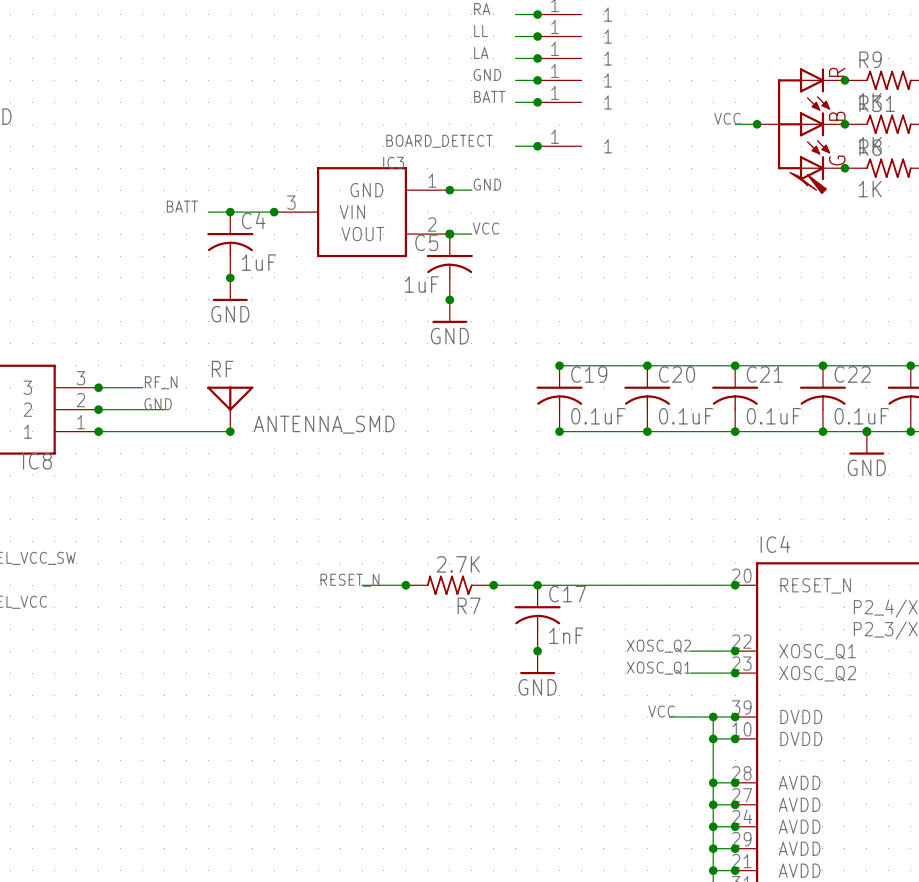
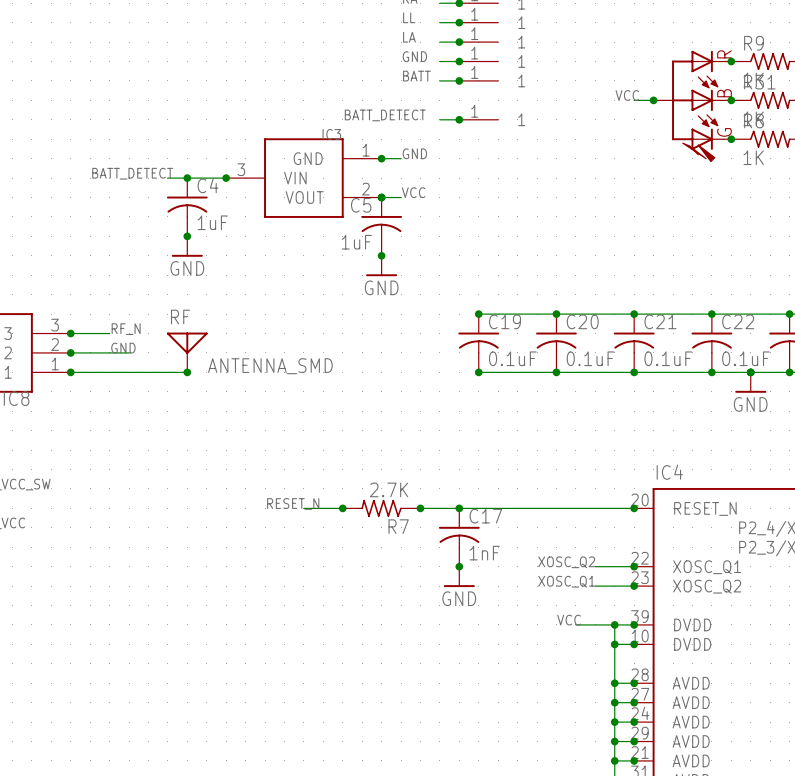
label: BOARD_DETECT (439, 141) -> BATT_DETECT (385, 115)
label: BATT (182, 206) -> none
label: none -> BATT_DETECT (132, 173)

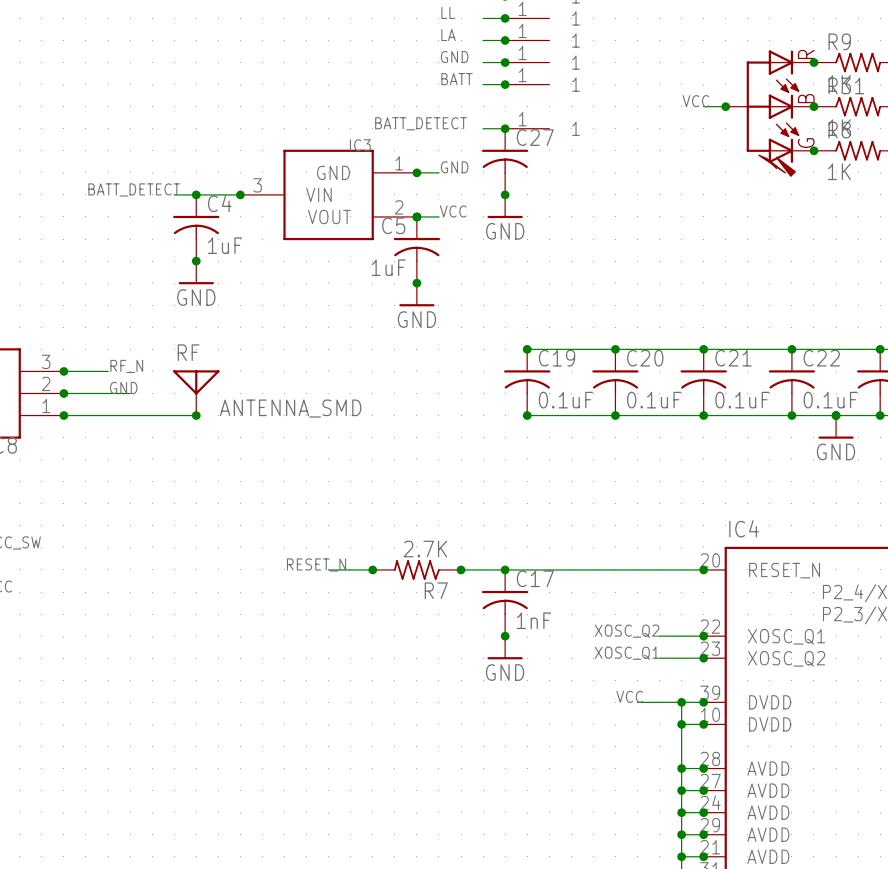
C27: none -> (505, 161)
junction: none -> (505, 194)
power symbol: none -> GND (505, 206)

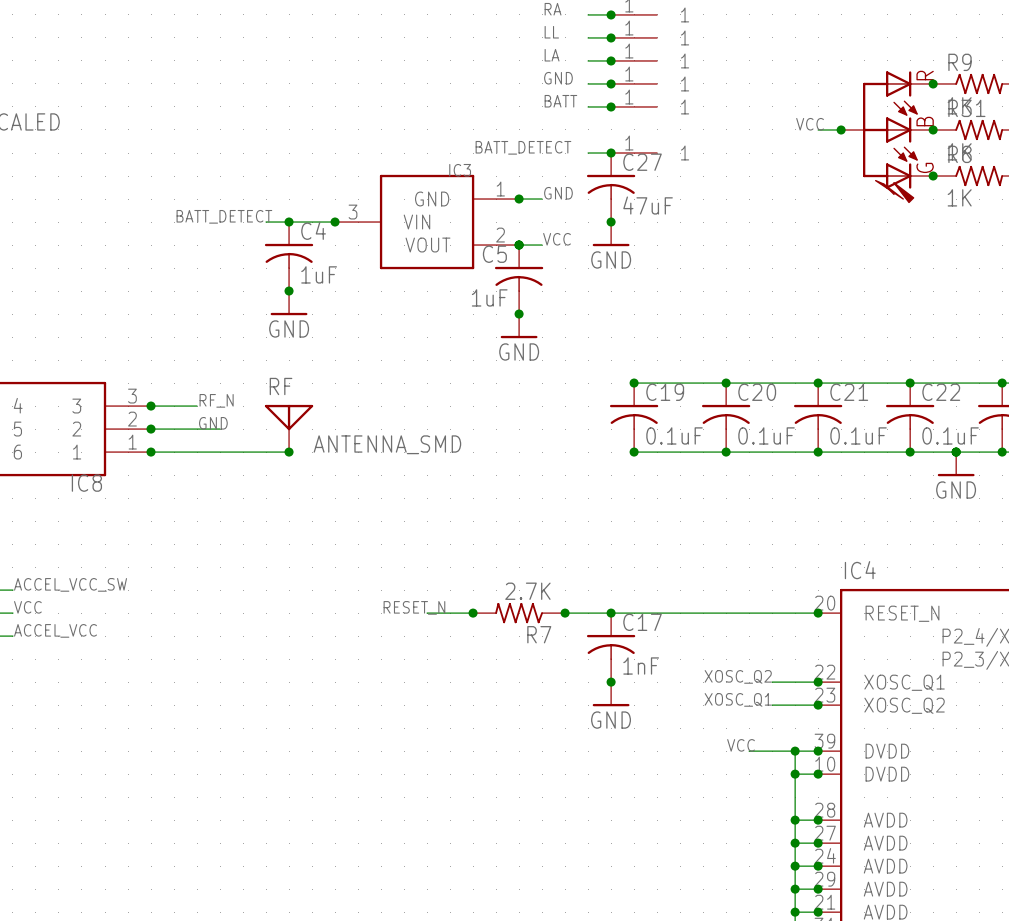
C27 value: none -> 47uF (648, 205)

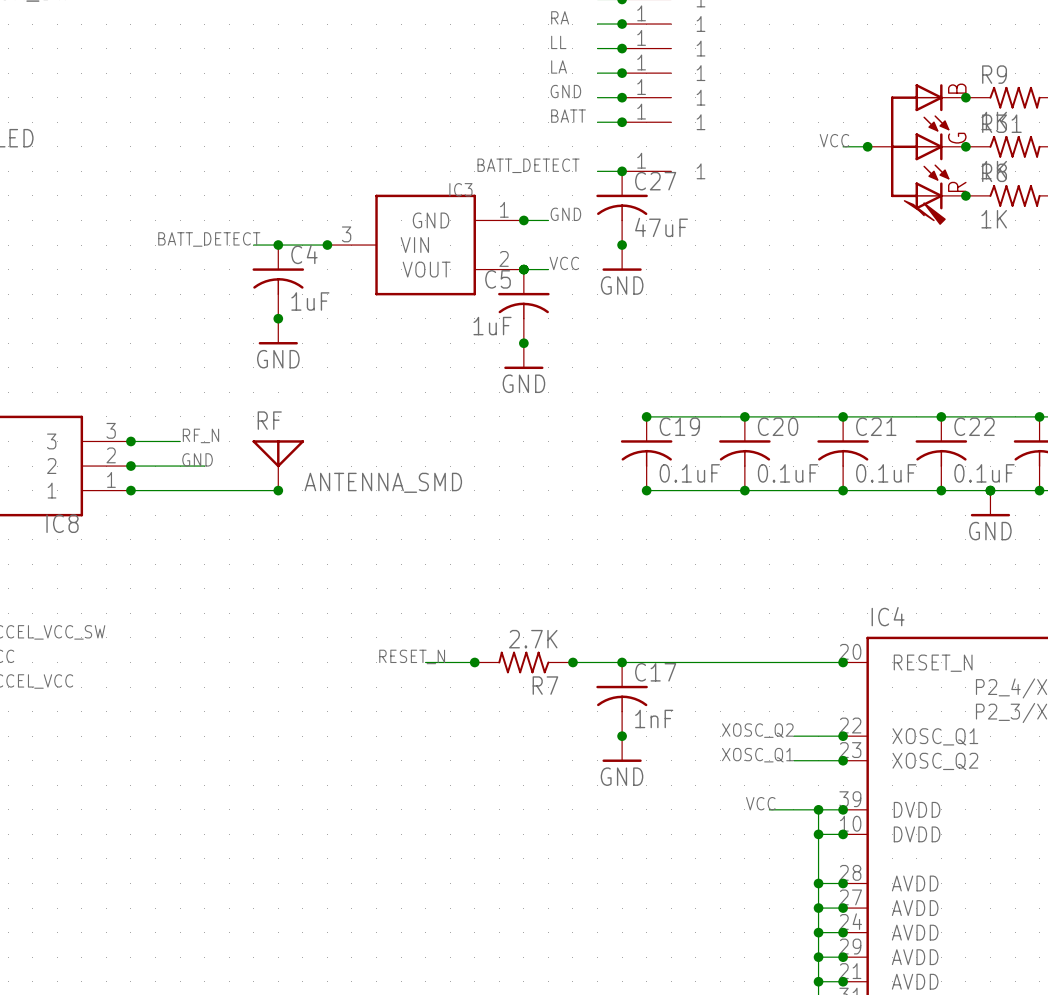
part text: R (925, 75) -> B (957, 88)
part text: B (925, 121) -> G (957, 138)
part text: G (925, 167) -> R (957, 186)

